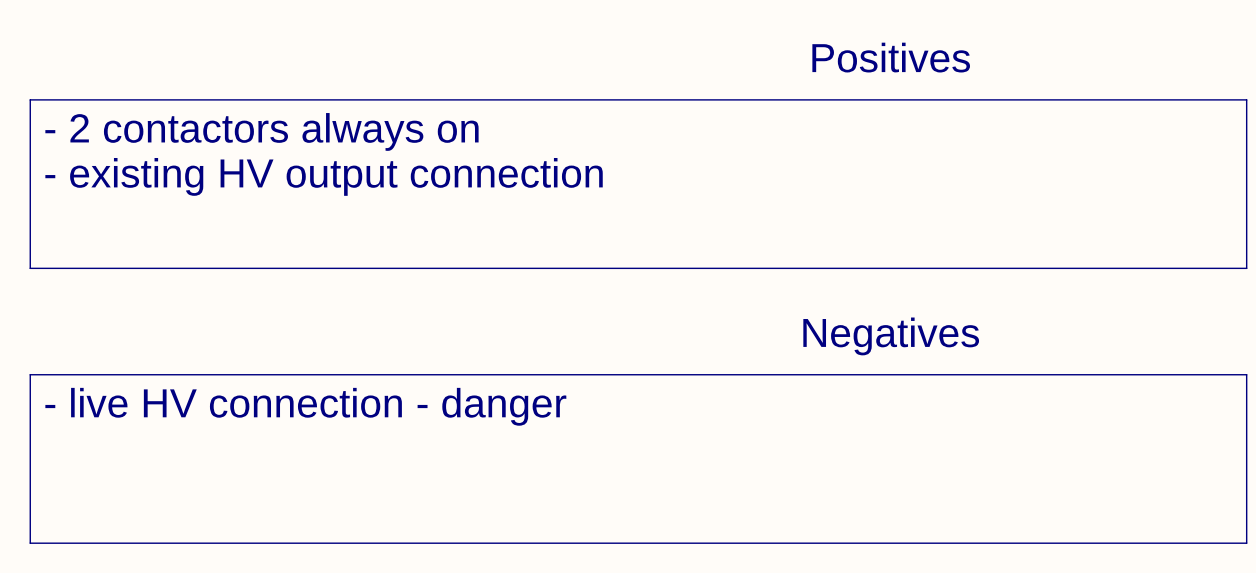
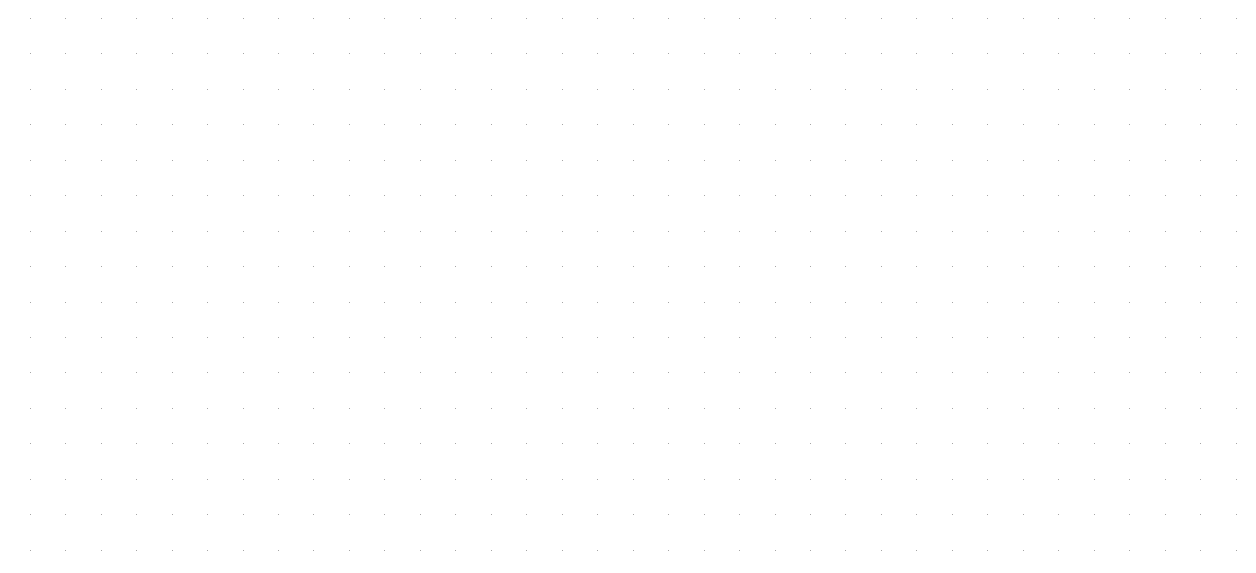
text: Positives (891, 57) -> none
line: (30, 99) (1246, 99) (1246, 268) (30, 268) (30, 99) -> none
text: - 2 contactors always on (261, 131) -> none
text: - existing HV output connection (324, 176) -> none
text: Negatives (891, 336) -> none
line: (30, 374) (30, 543) (1246, 543) (1246, 374) (30, 374) -> none
text: - live HV connection - danger (305, 406) -> none

